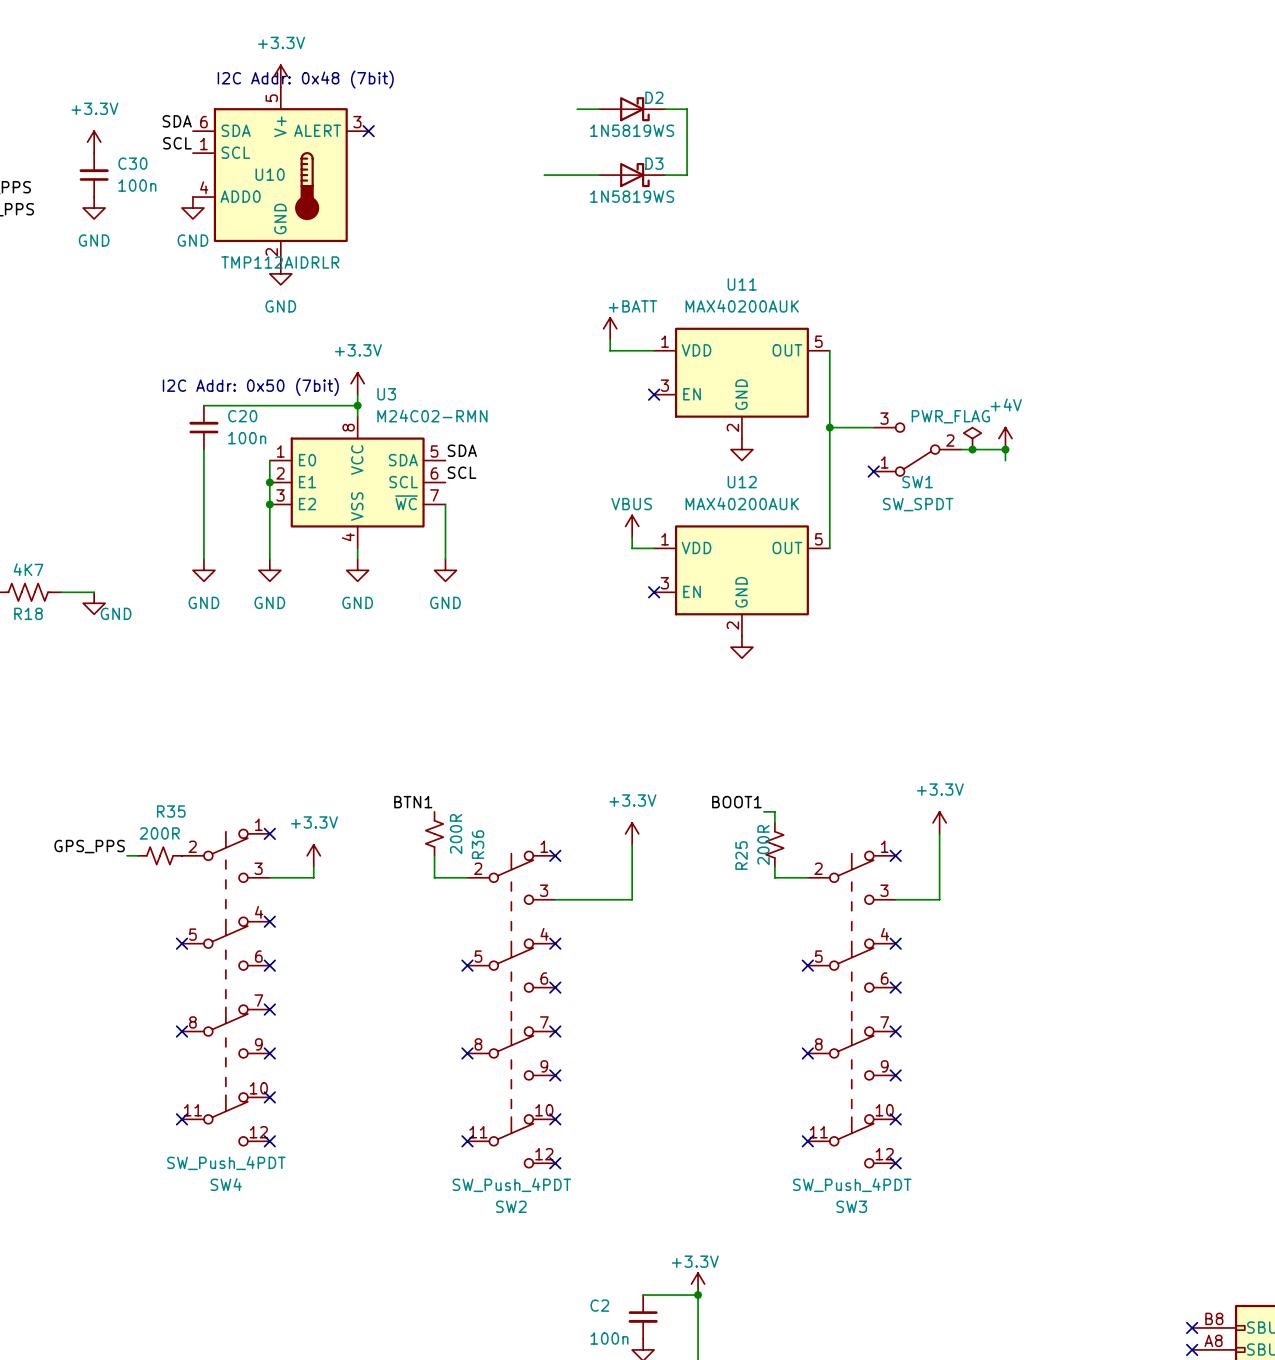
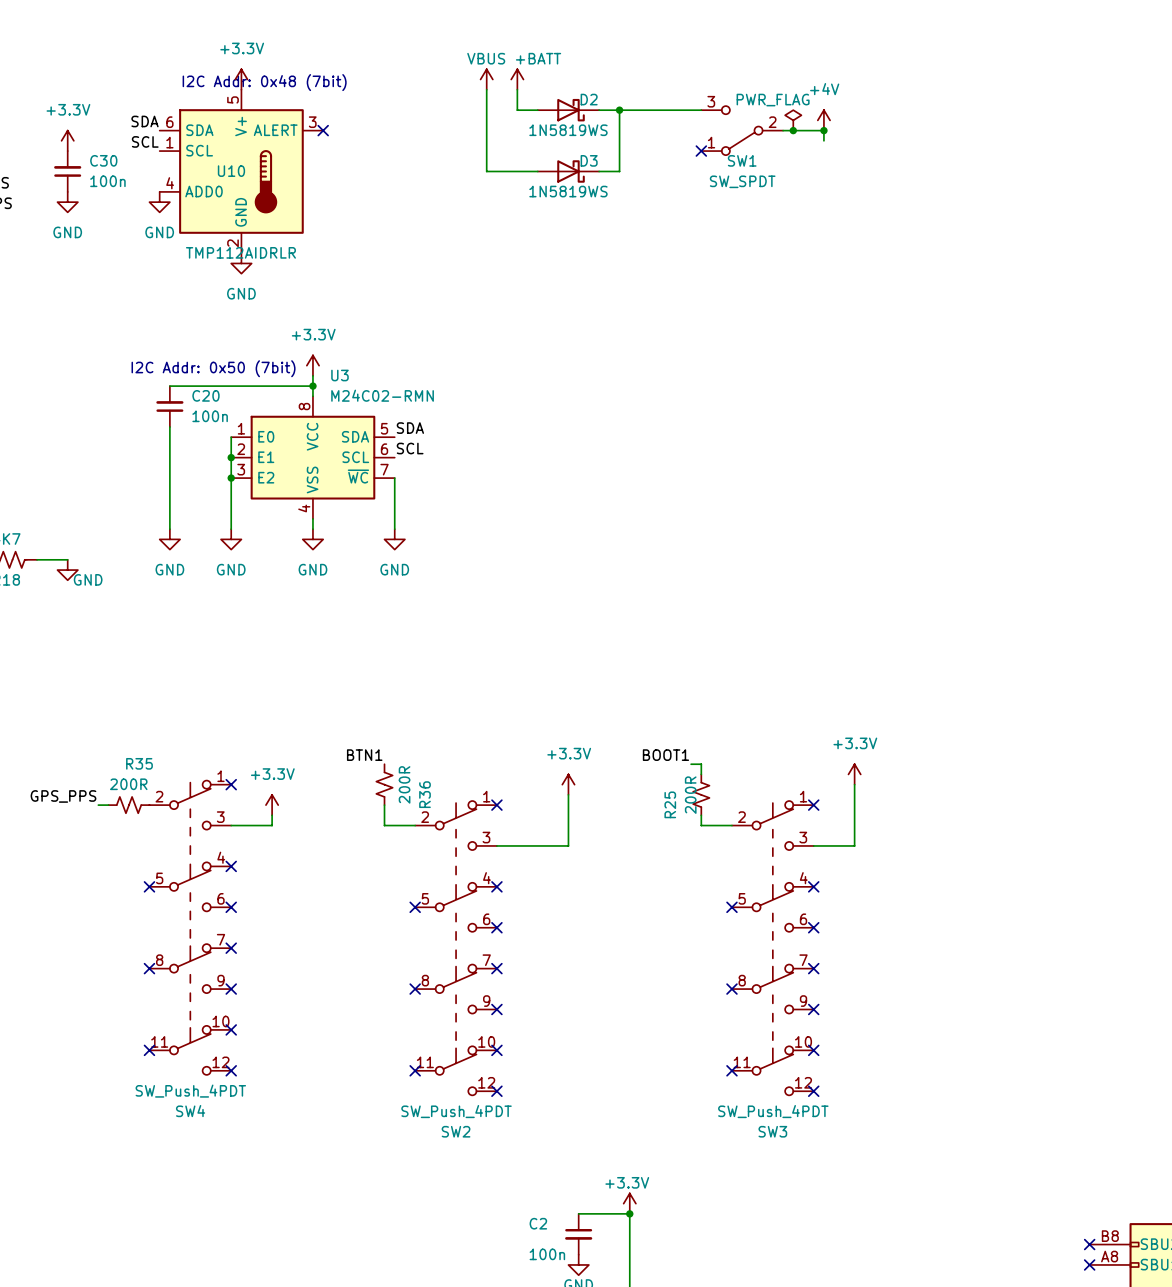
power symbol: none -> VBUS (486, 79)
power symbol: none -> +BATT (517, 79)
wire: none -> (486, 89) (486, 171)
wire: none -> (517, 89) (517, 110)
wire: none -> (619, 110) (701, 110)
junction: none -> (619, 110)
power symbol: none -> PWR_FLAG (793, 120)
power symbol: none -> +4V (823, 120)
wire: none -> (783, 130) (823, 130) (823, 140)
junction: none -> (793, 130)
junction: none -> (823, 130)
no-connect mark: none -> (701, 151)
power symbol: +BATT (610, 328) -> none
wire: (610, 339) (610, 350) (654, 350) -> none
wire: (829, 350) (829, 548) -> none
U11: MAX40200AUK (741, 383) -> none
no-connect mark: (654, 394) -> none
wire: (829, 427) (873, 427) -> none
junction: (829, 427) -> none
power symbol: PWR_FLAG (972, 438) -> none
power symbol: +4V (1005, 438) -> none
power symbol: (741, 449) -> none
SW1 position: (917, 449) -> (742, 130)
wire: (961, 449) (1005, 449) (1005, 460) -> none
junction: (972, 449) -> none
junction: (1005, 449) -> none
no-connect mark: (873, 471) -> none
power symbol: VBUS (632, 526) -> none
wire: (632, 537) (632, 548) (654, 548) -> none
U12: MAX40200AUK (741, 580) -> none
no-connect mark: (654, 592) -> none
power symbol: (741, 647) -> none

